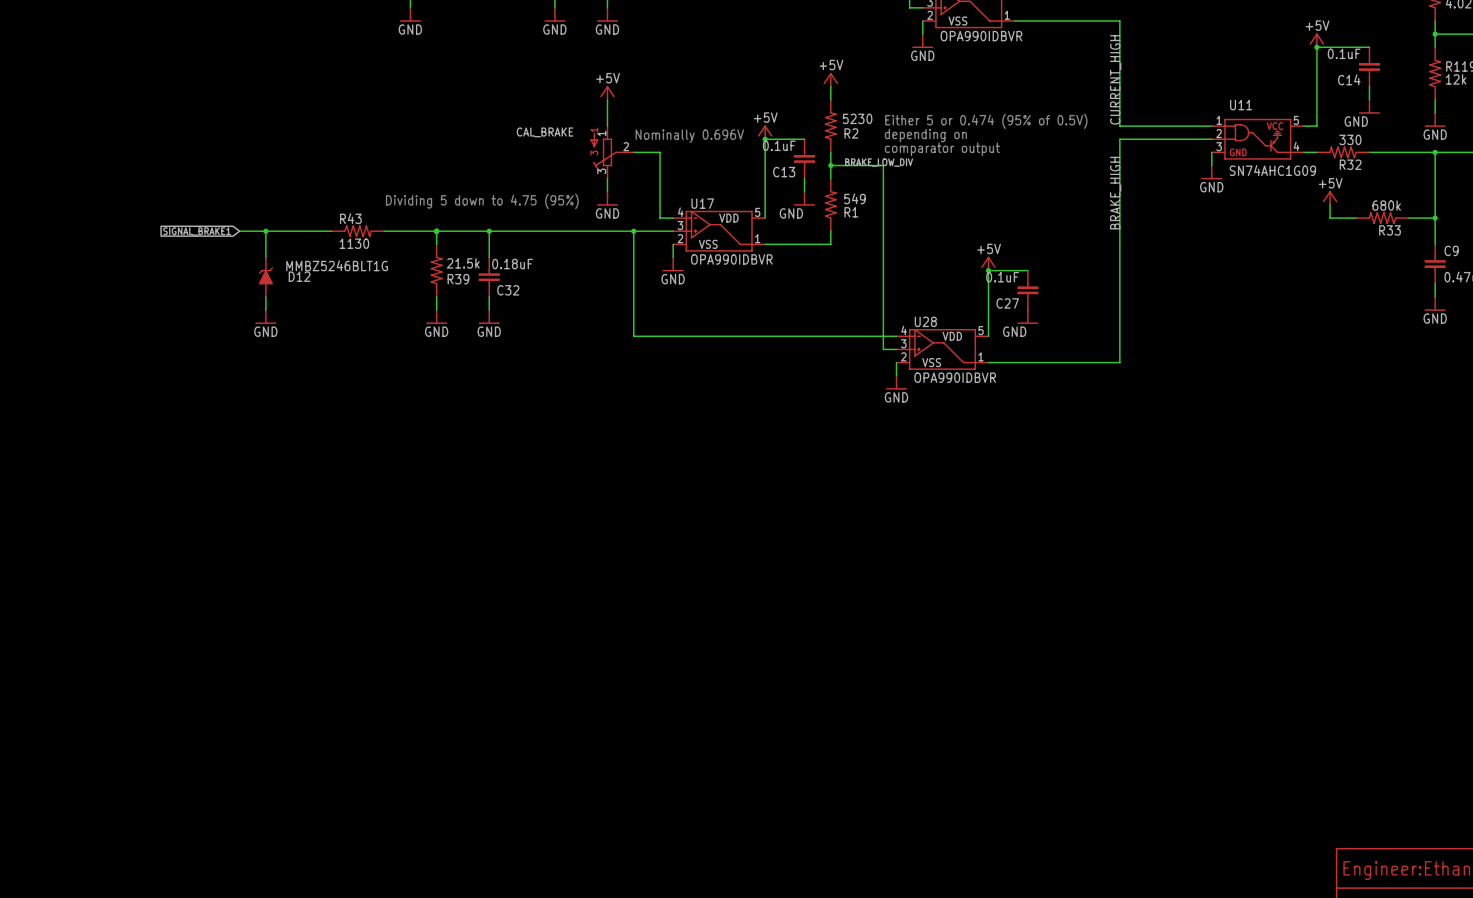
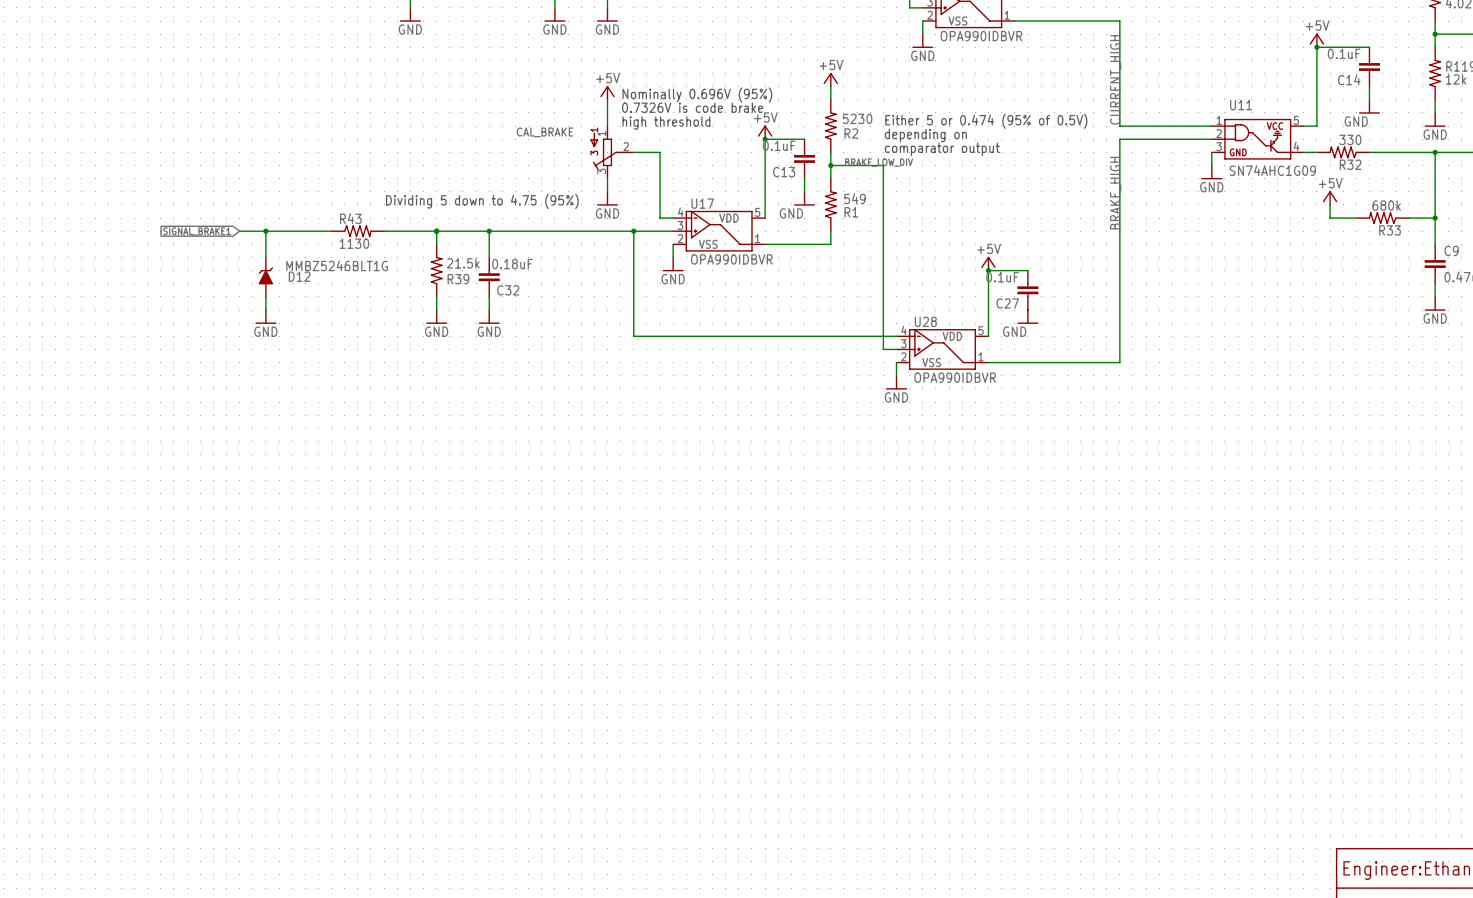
text: none -> Nominally 0.696V (95%) (697, 95)
text: none -> 0.7326V is code brake (692, 107)
text: none -> high threshold (666, 123)
text: Nominally 0.696V (689, 136) -> none

